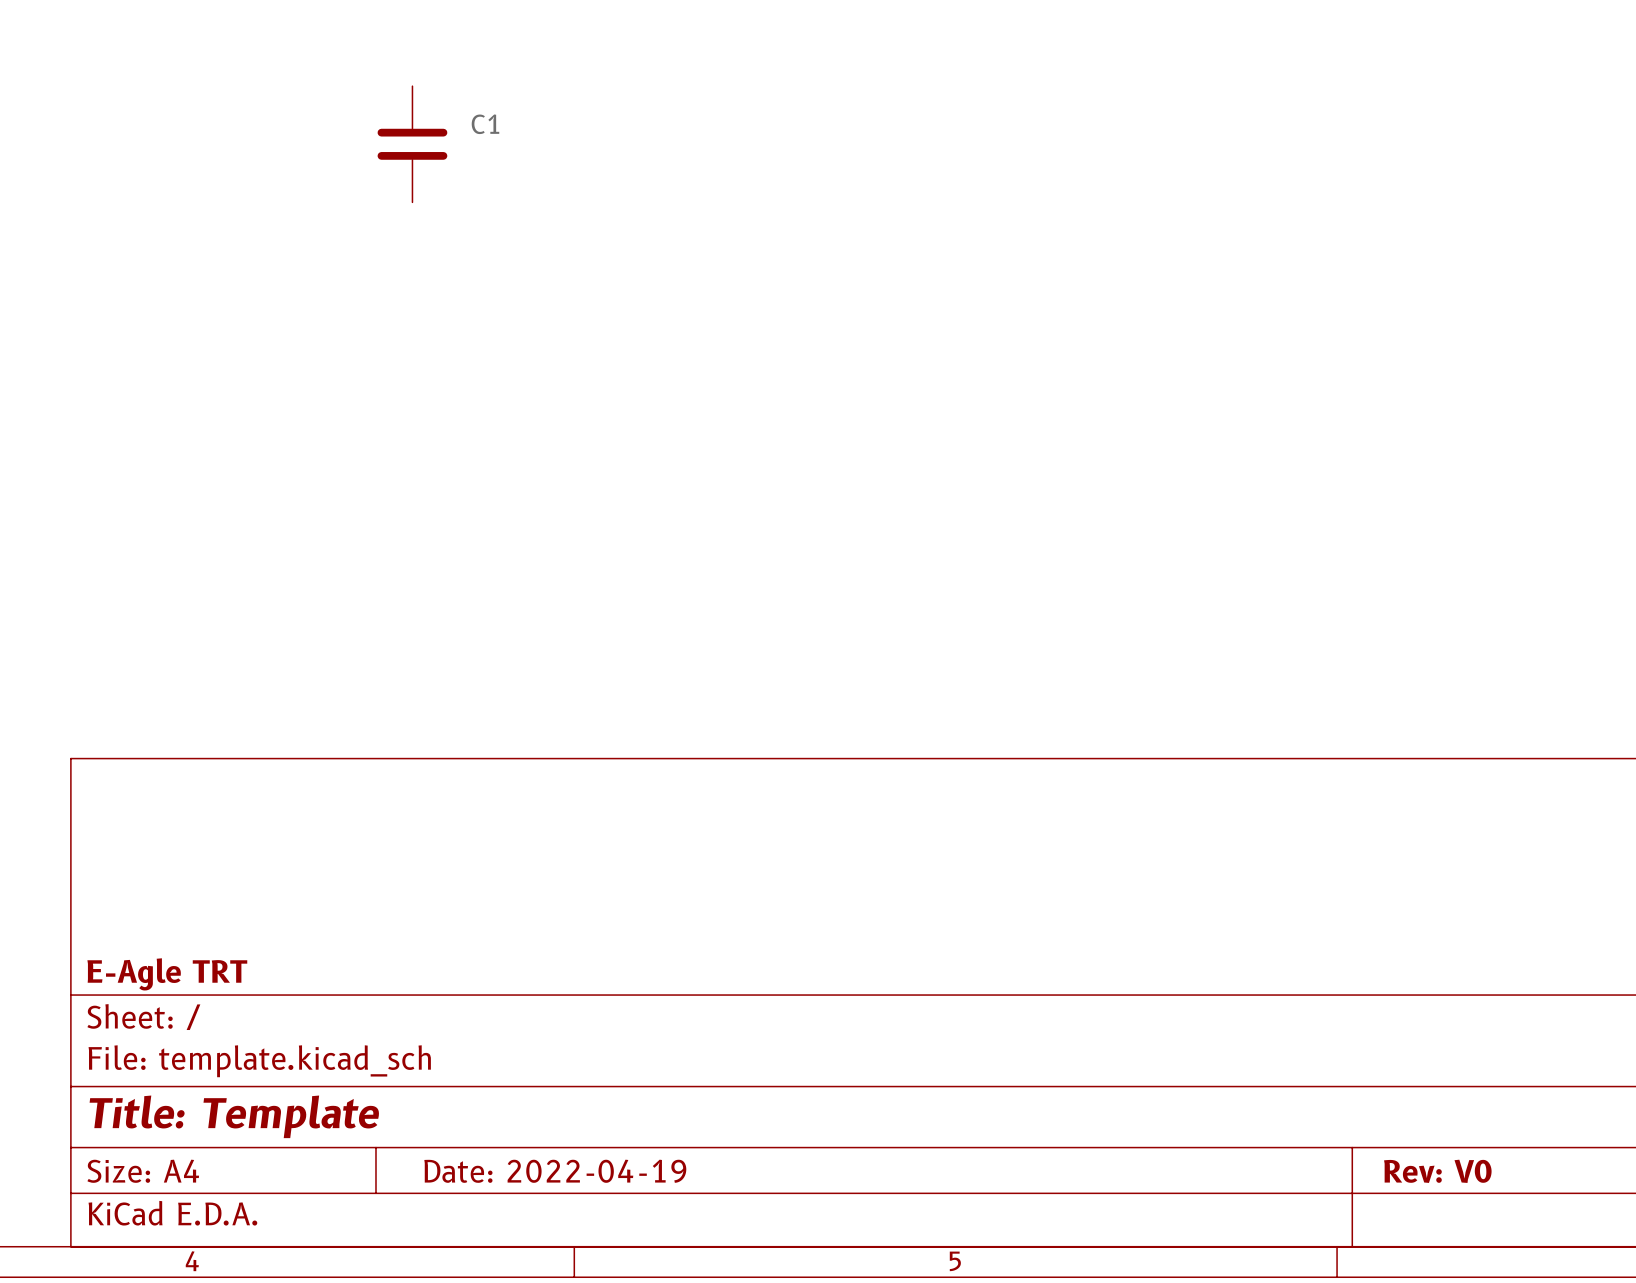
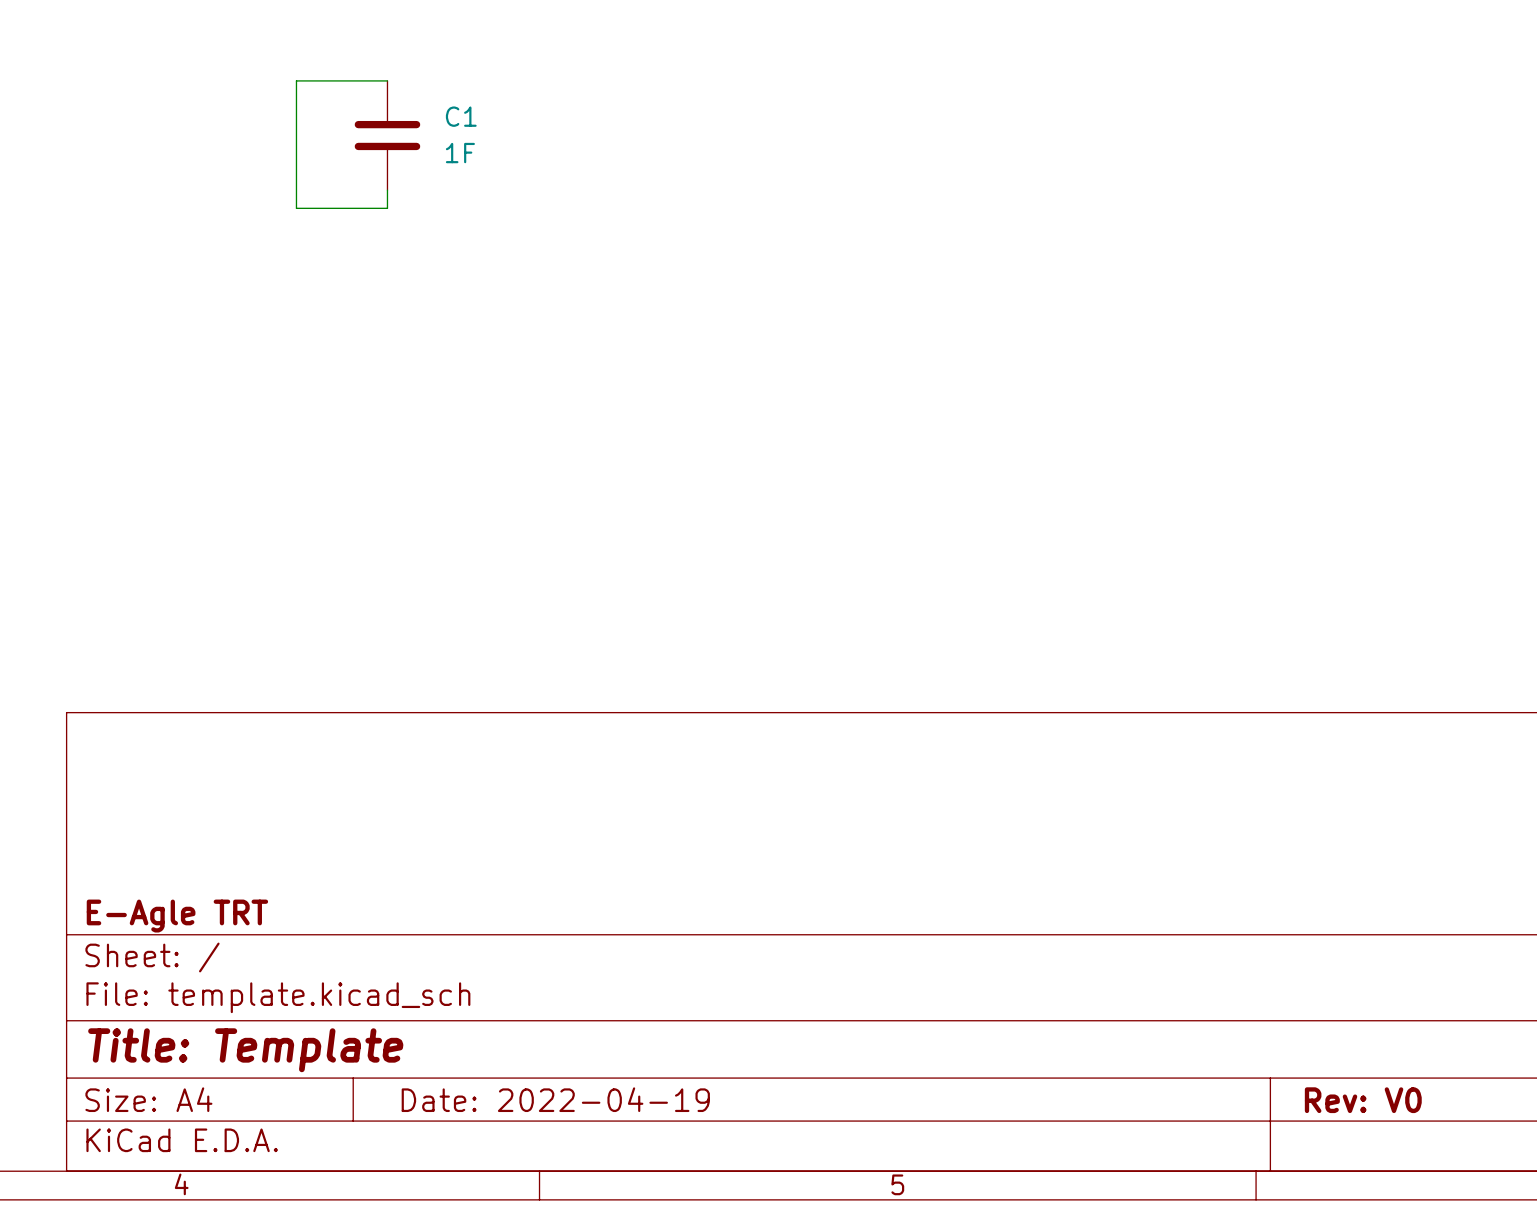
wire: none -> (387, 80) (296, 80) (296, 208) (387, 208) (387, 190)
C1 value: none -> 1F (460, 153)

